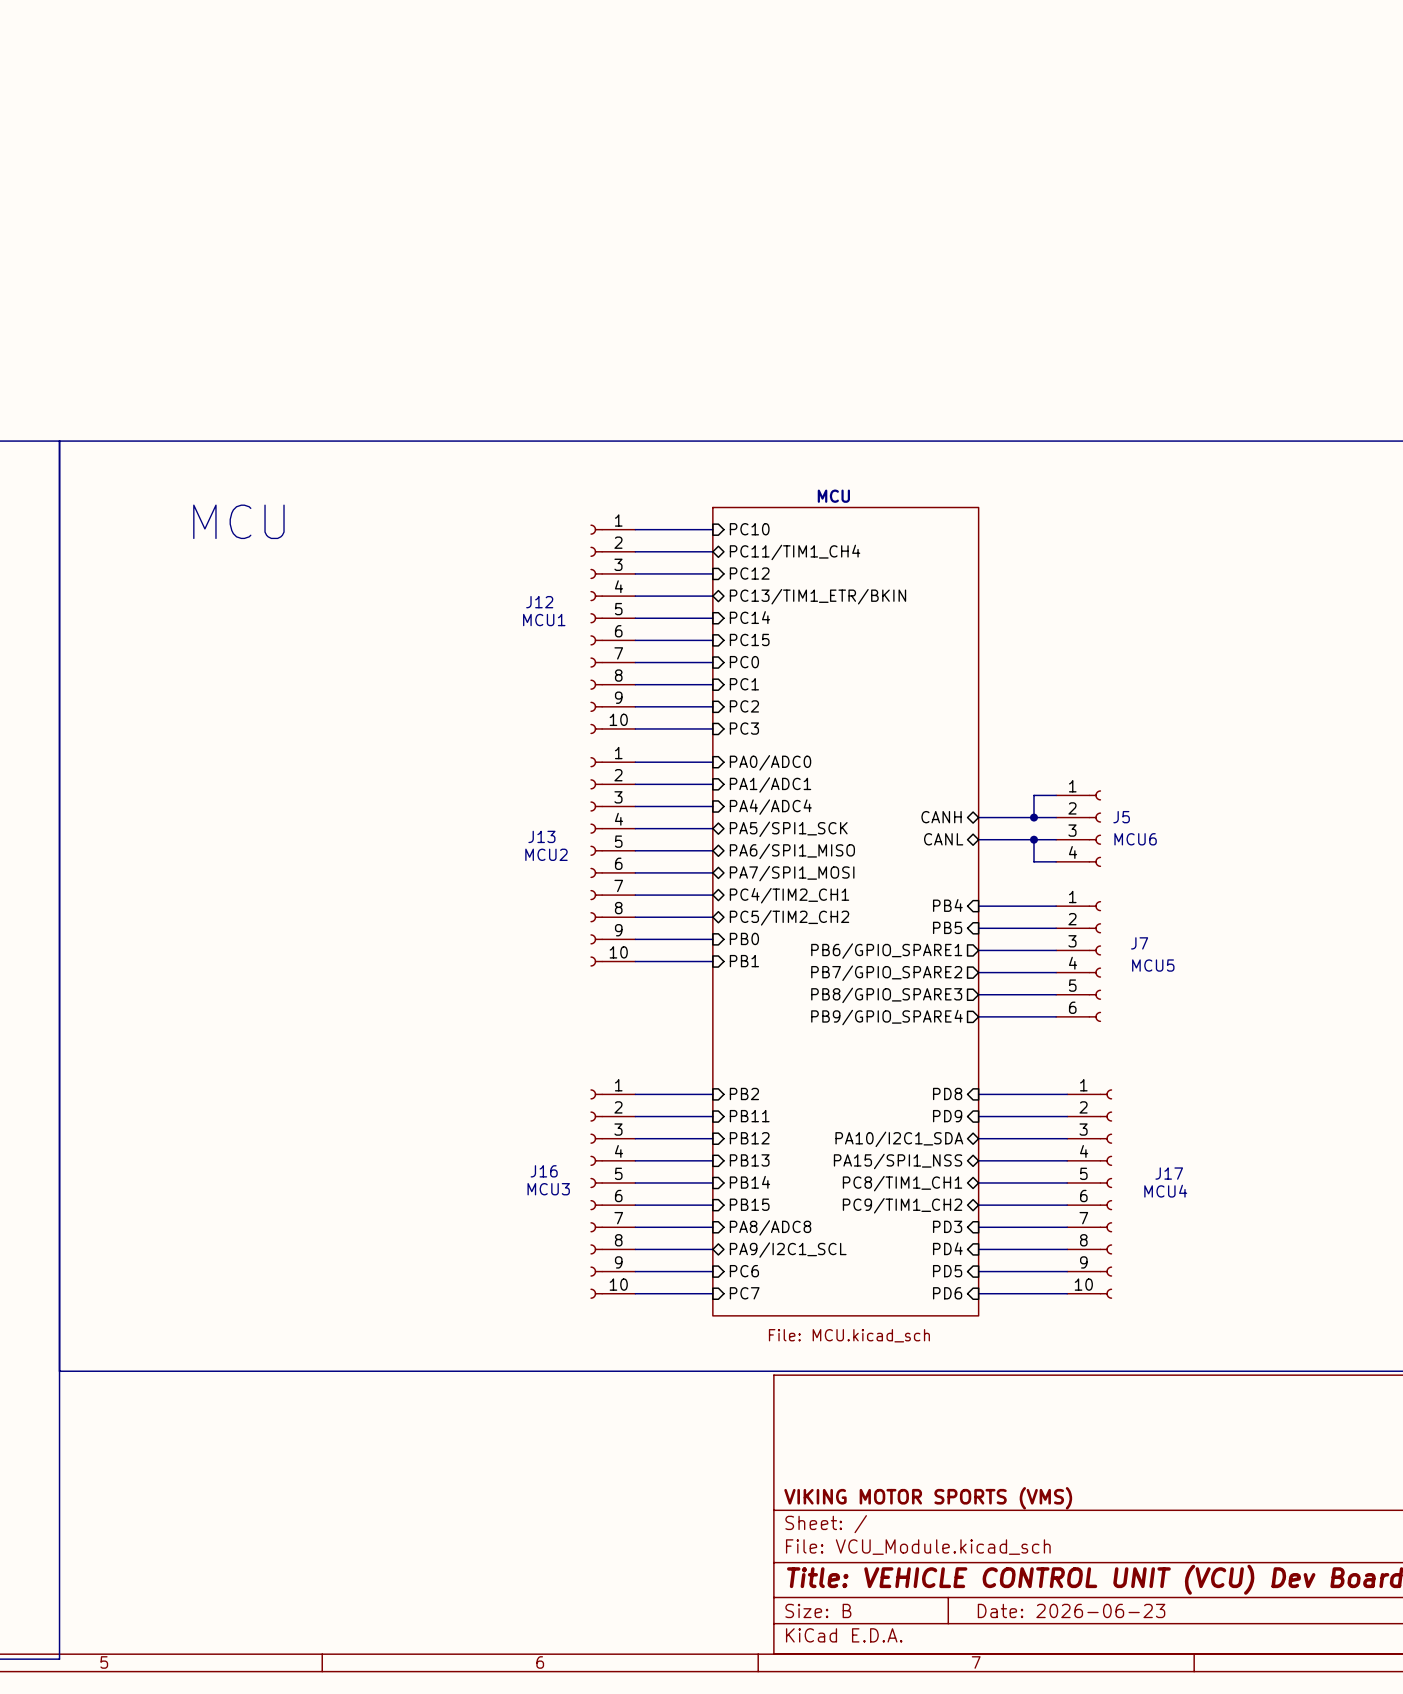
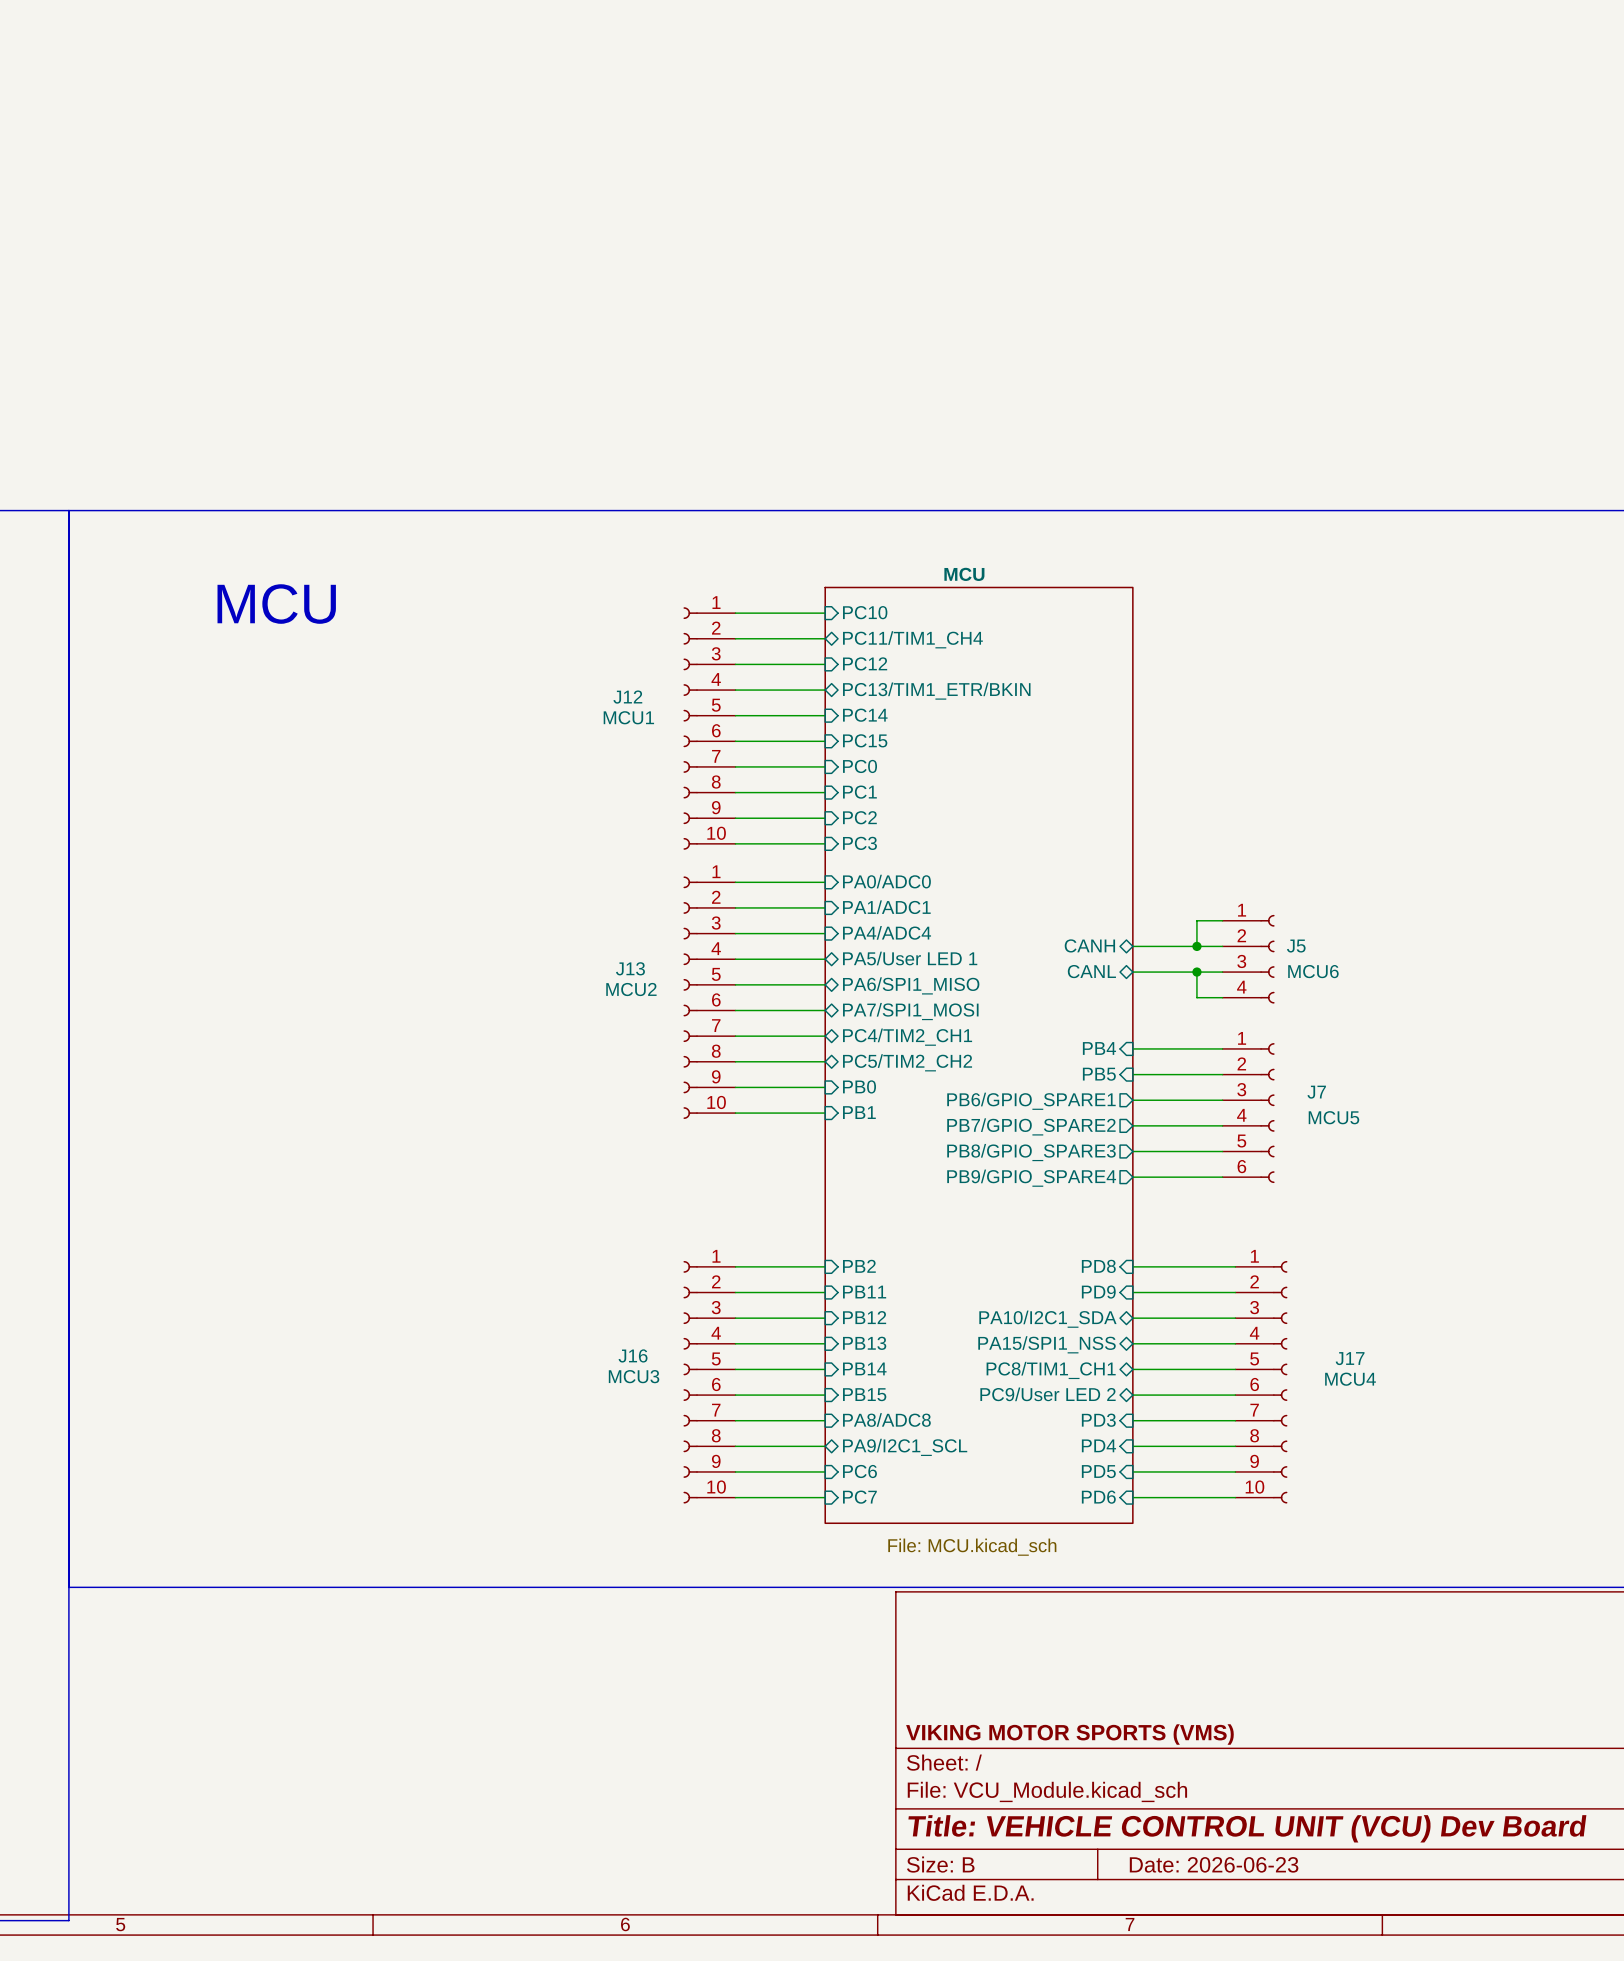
sheet pin: PA5/SPI1_SCK (788, 829) -> PA5/User LED 1 (910, 958)
sheet pin: PC9/TIM1_CH2 (902, 1205) -> PC9/User LED 2 (1048, 1394)

